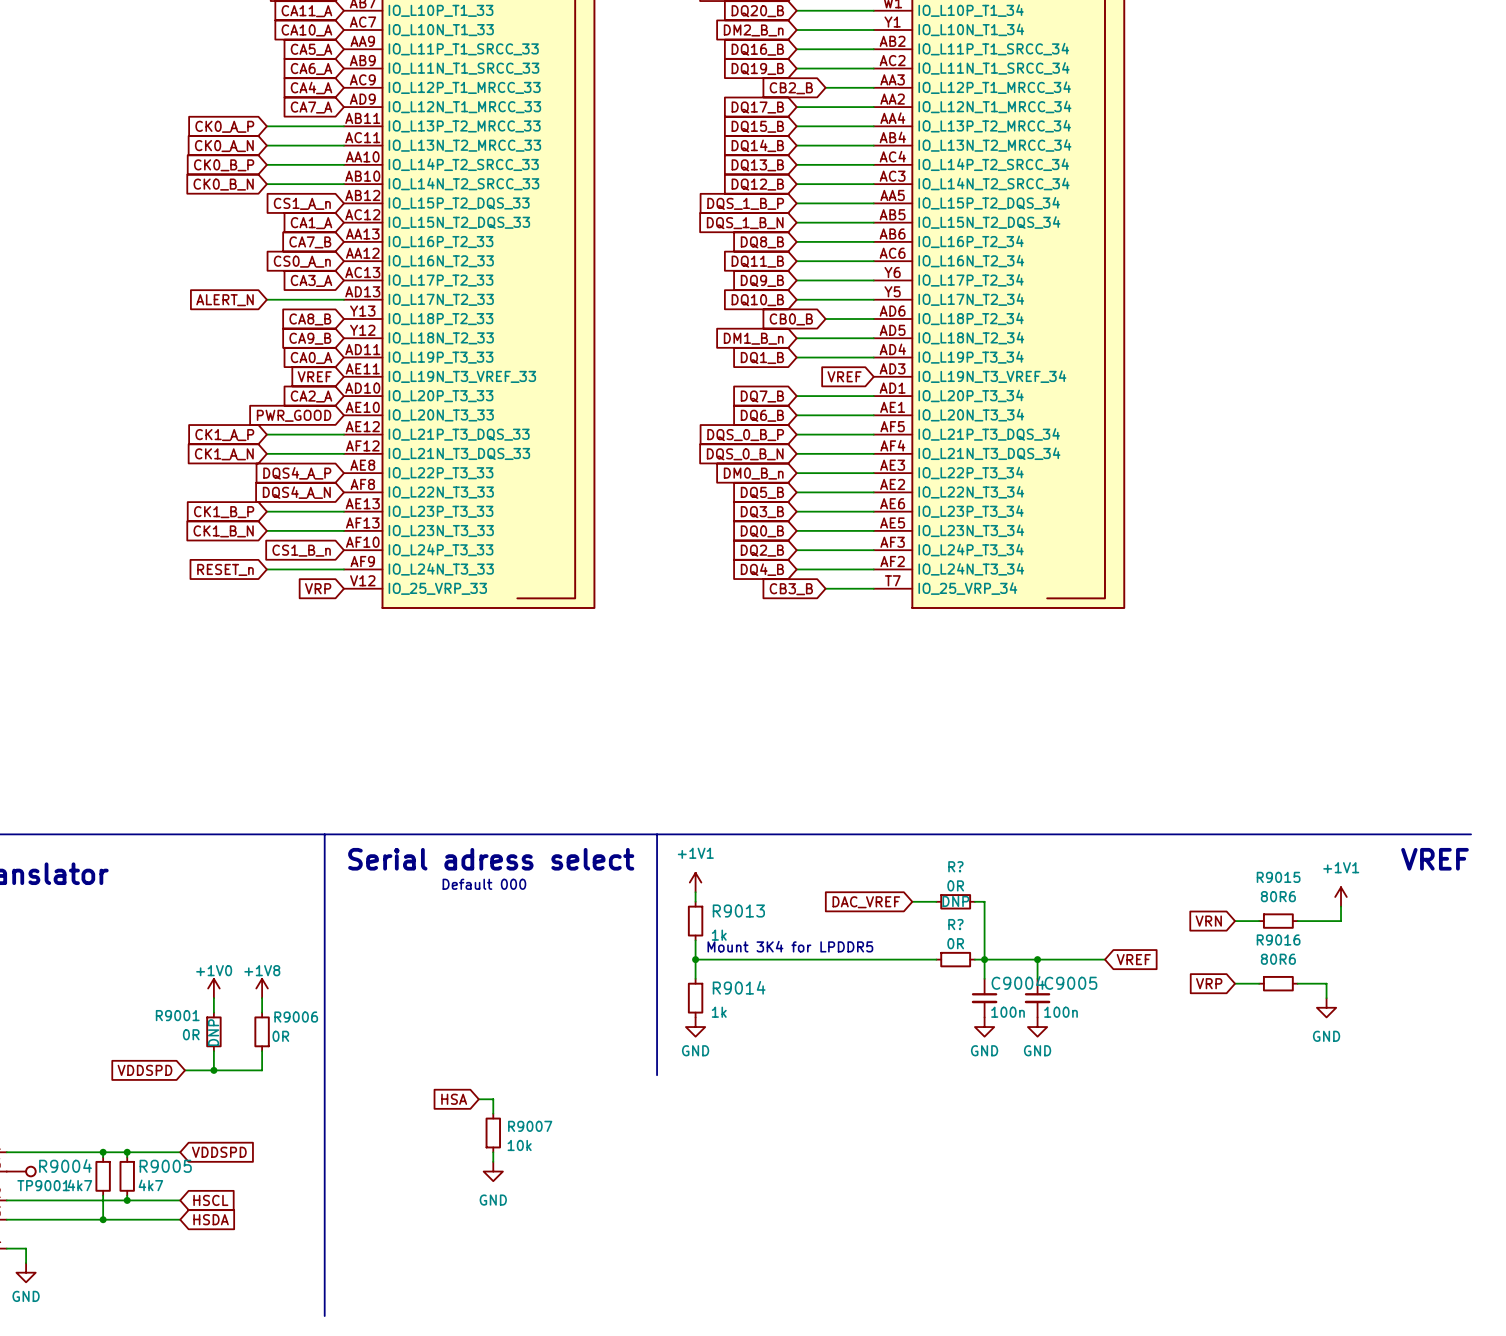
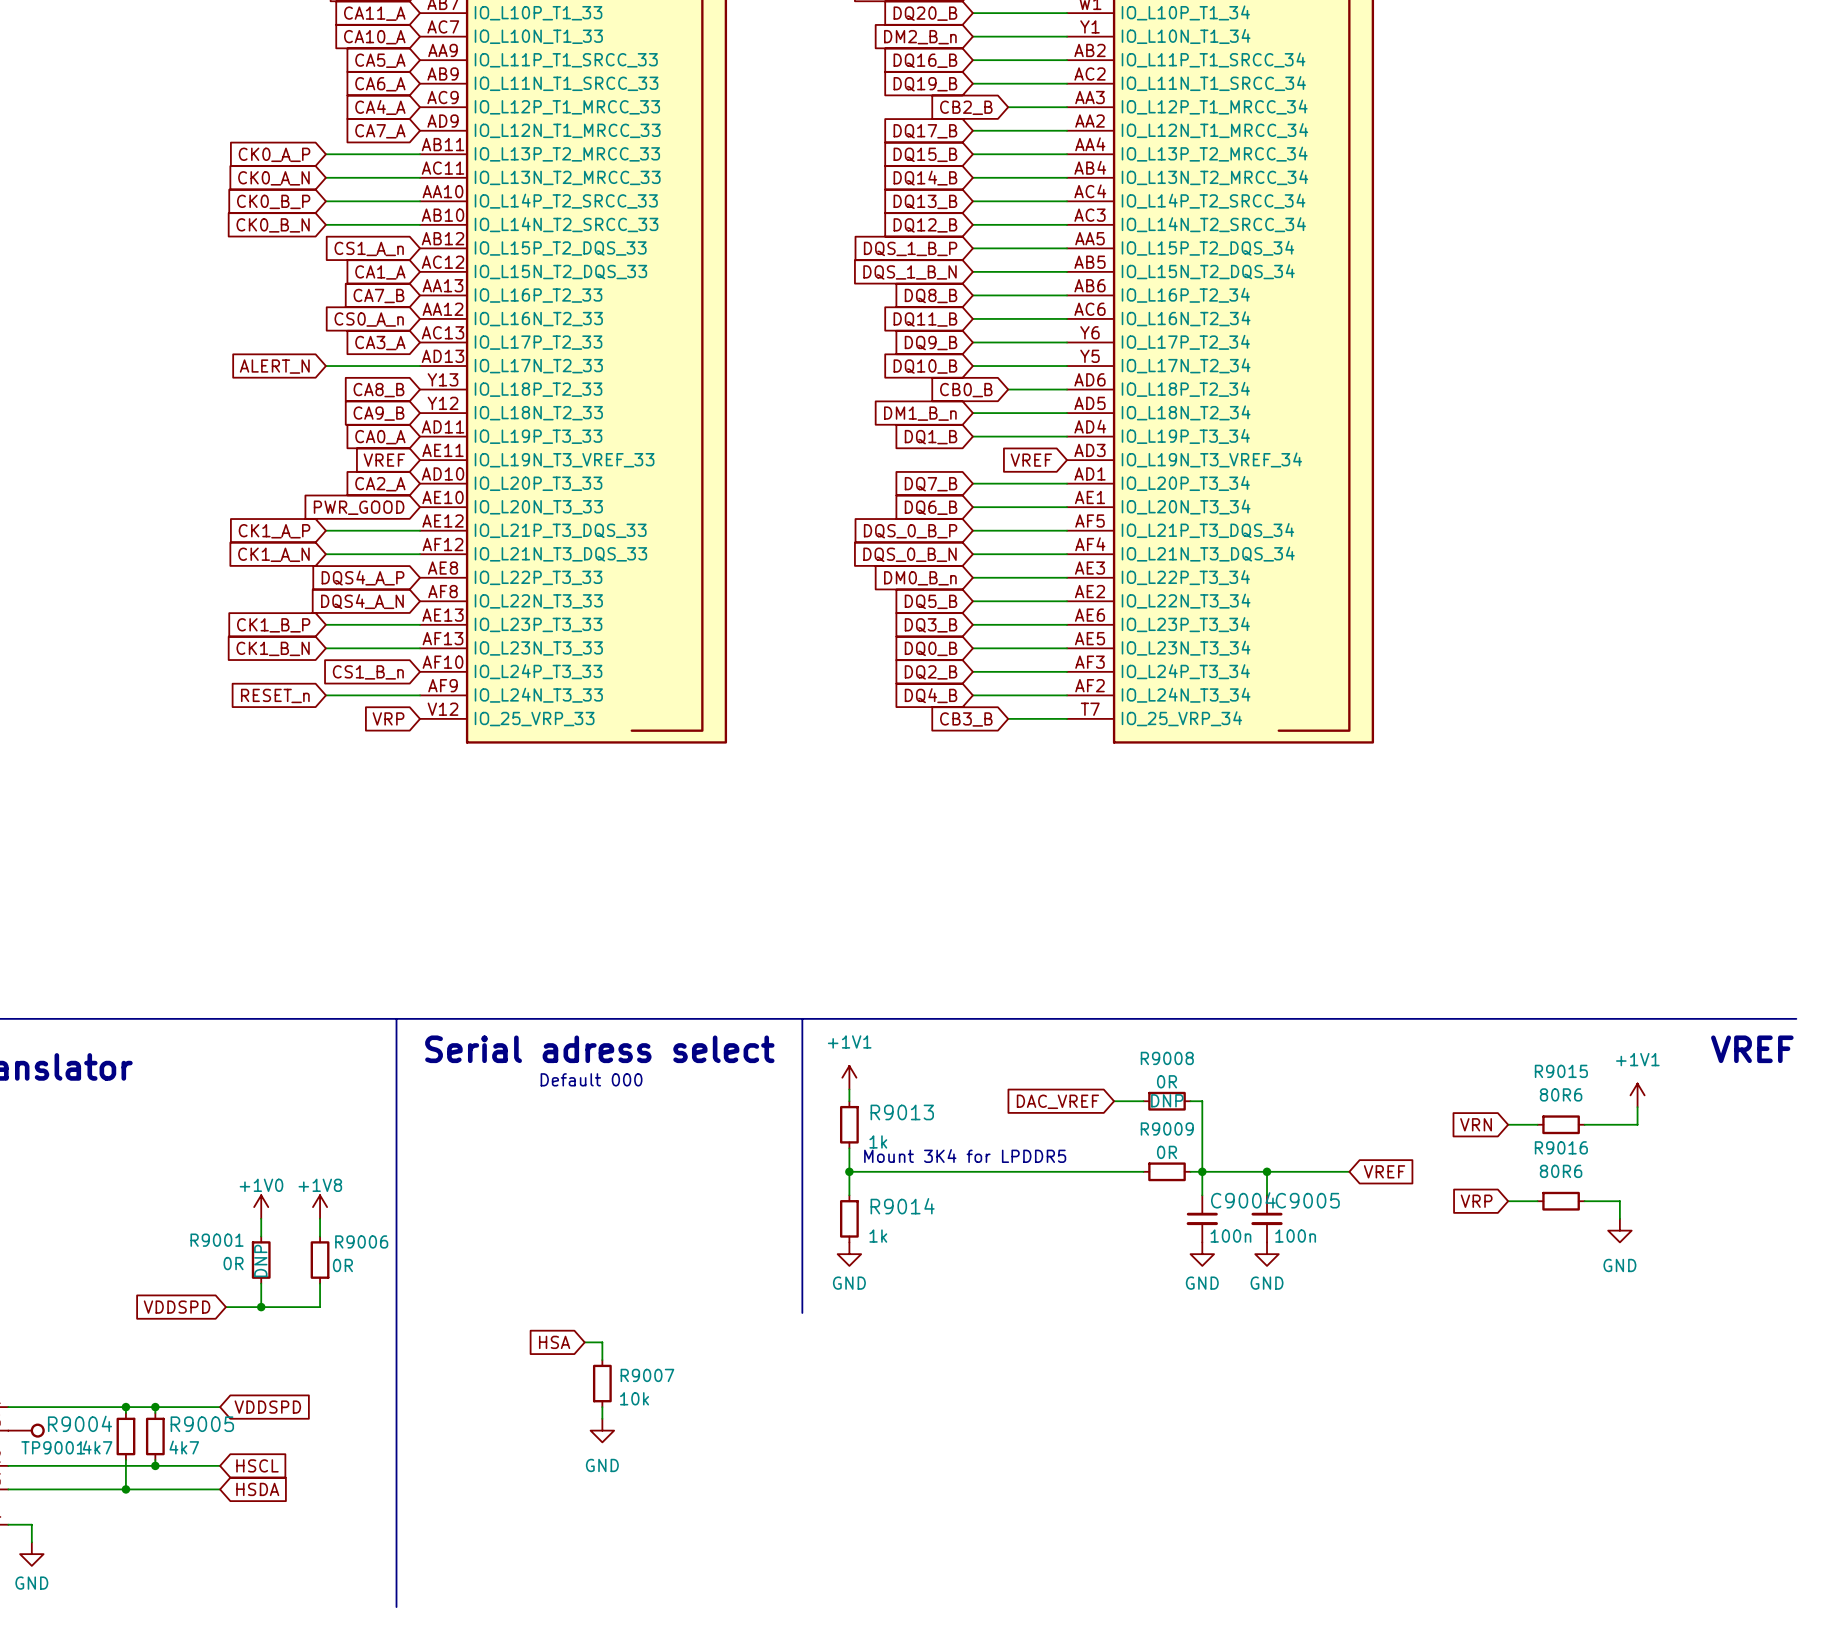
R? name: R? (955, 866) -> R9008 (1167, 1058)
R? name: R? (955, 924) -> R9009 (1167, 1129)

